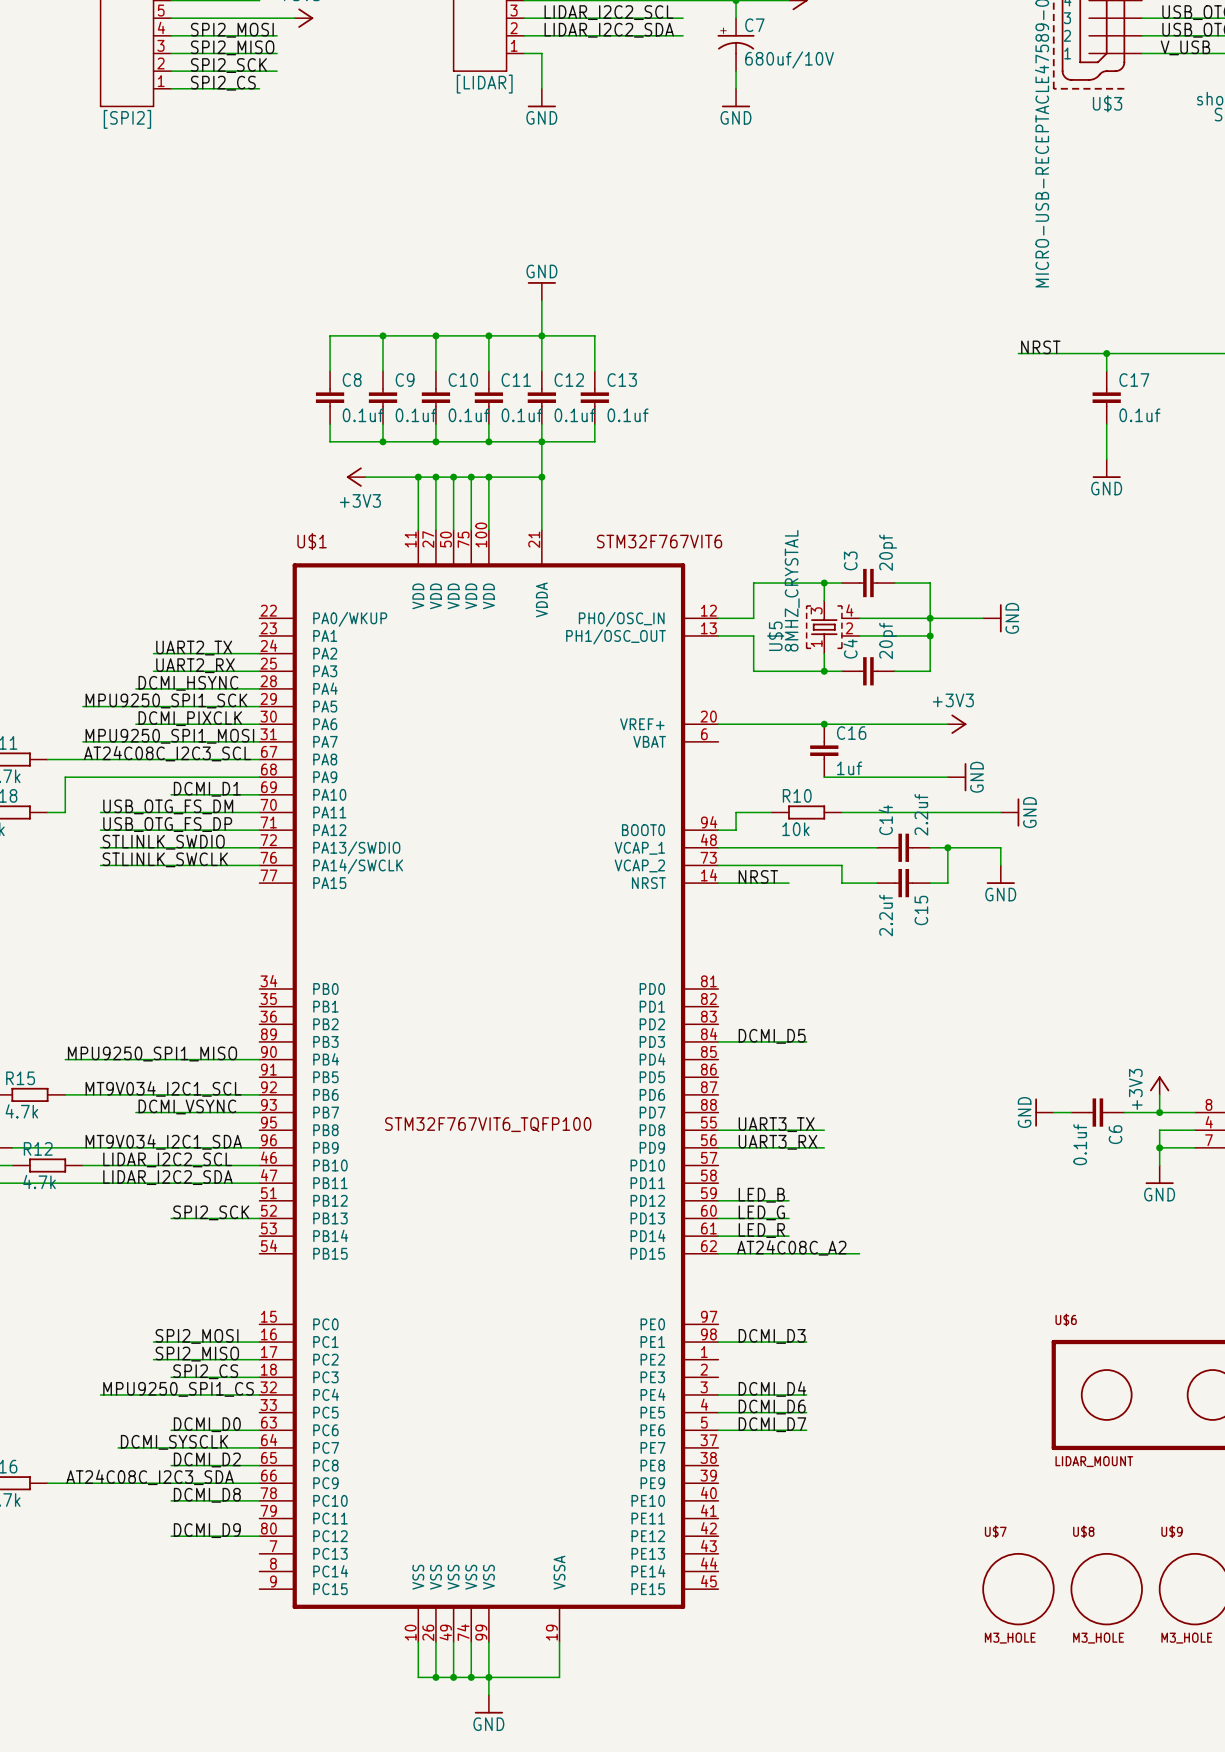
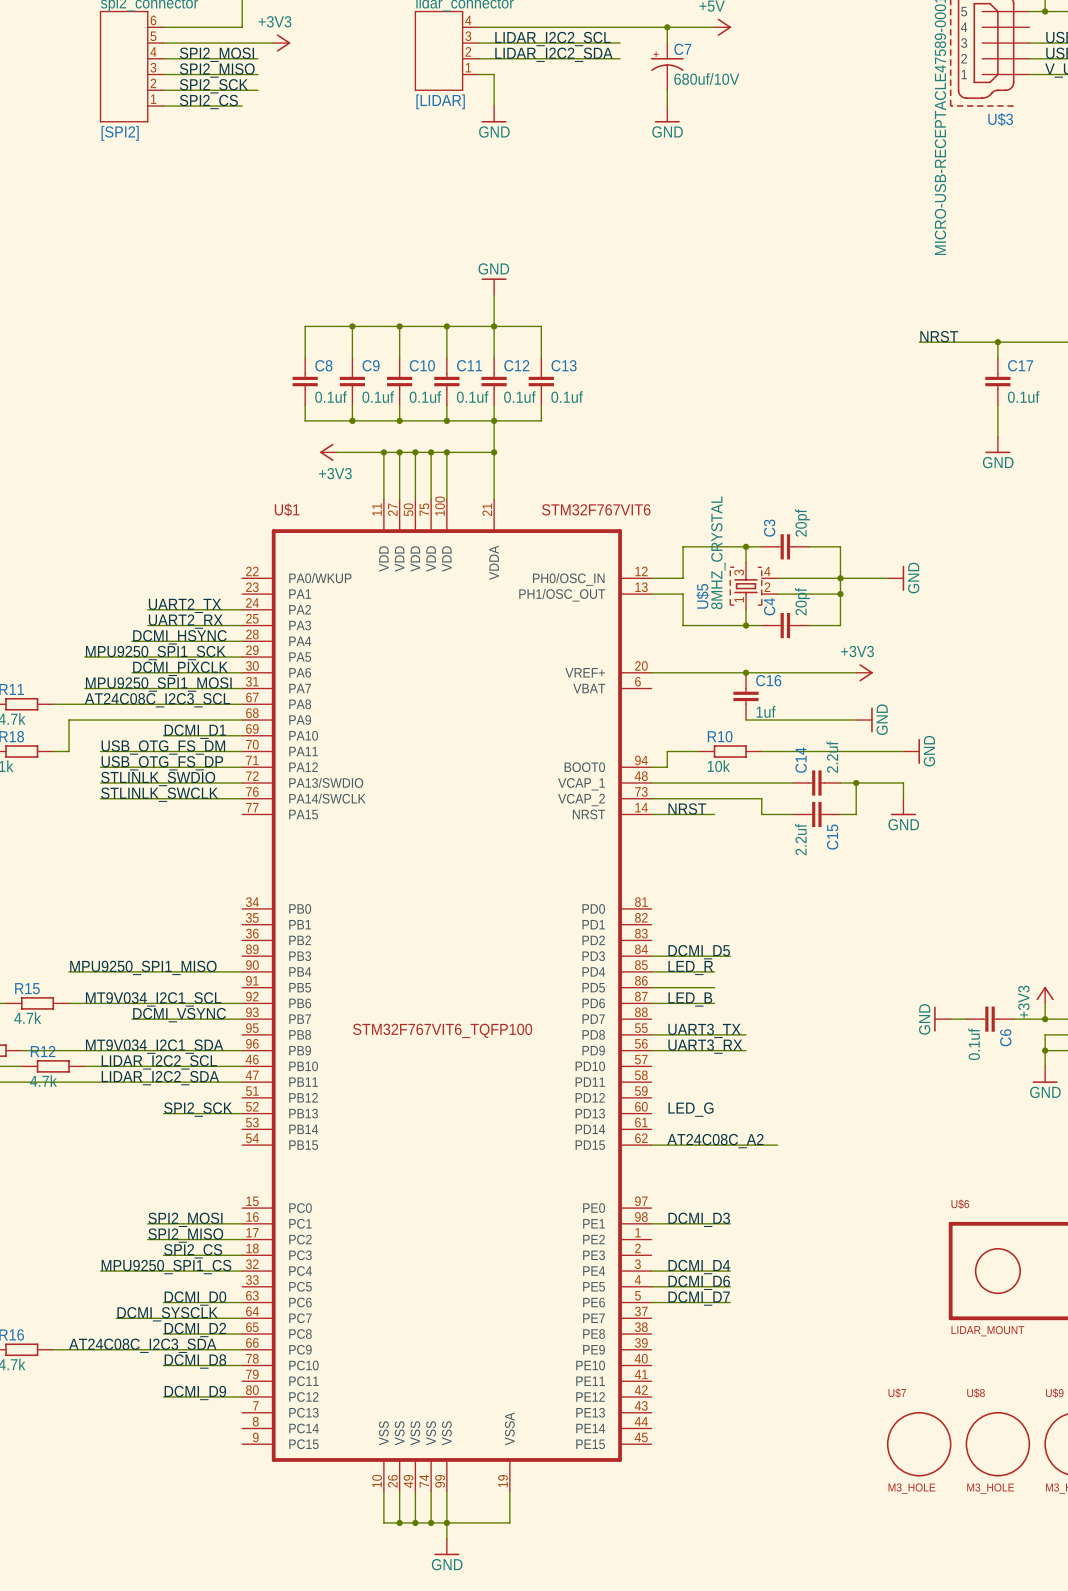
label: none -> LED_R (690, 967)
label position: LED_B (761, 1195) -> LED_B (690, 999)
wire: (718, 1200) (788, 1200) -> (651, 971) (714, 971)
wire: (718, 1218) (788, 1218) -> (651, 987) (714, 987)
label: LED_R (761, 1230) -> none
wire: (718, 1236) (788, 1236) -> (651, 1003) (714, 1003)

